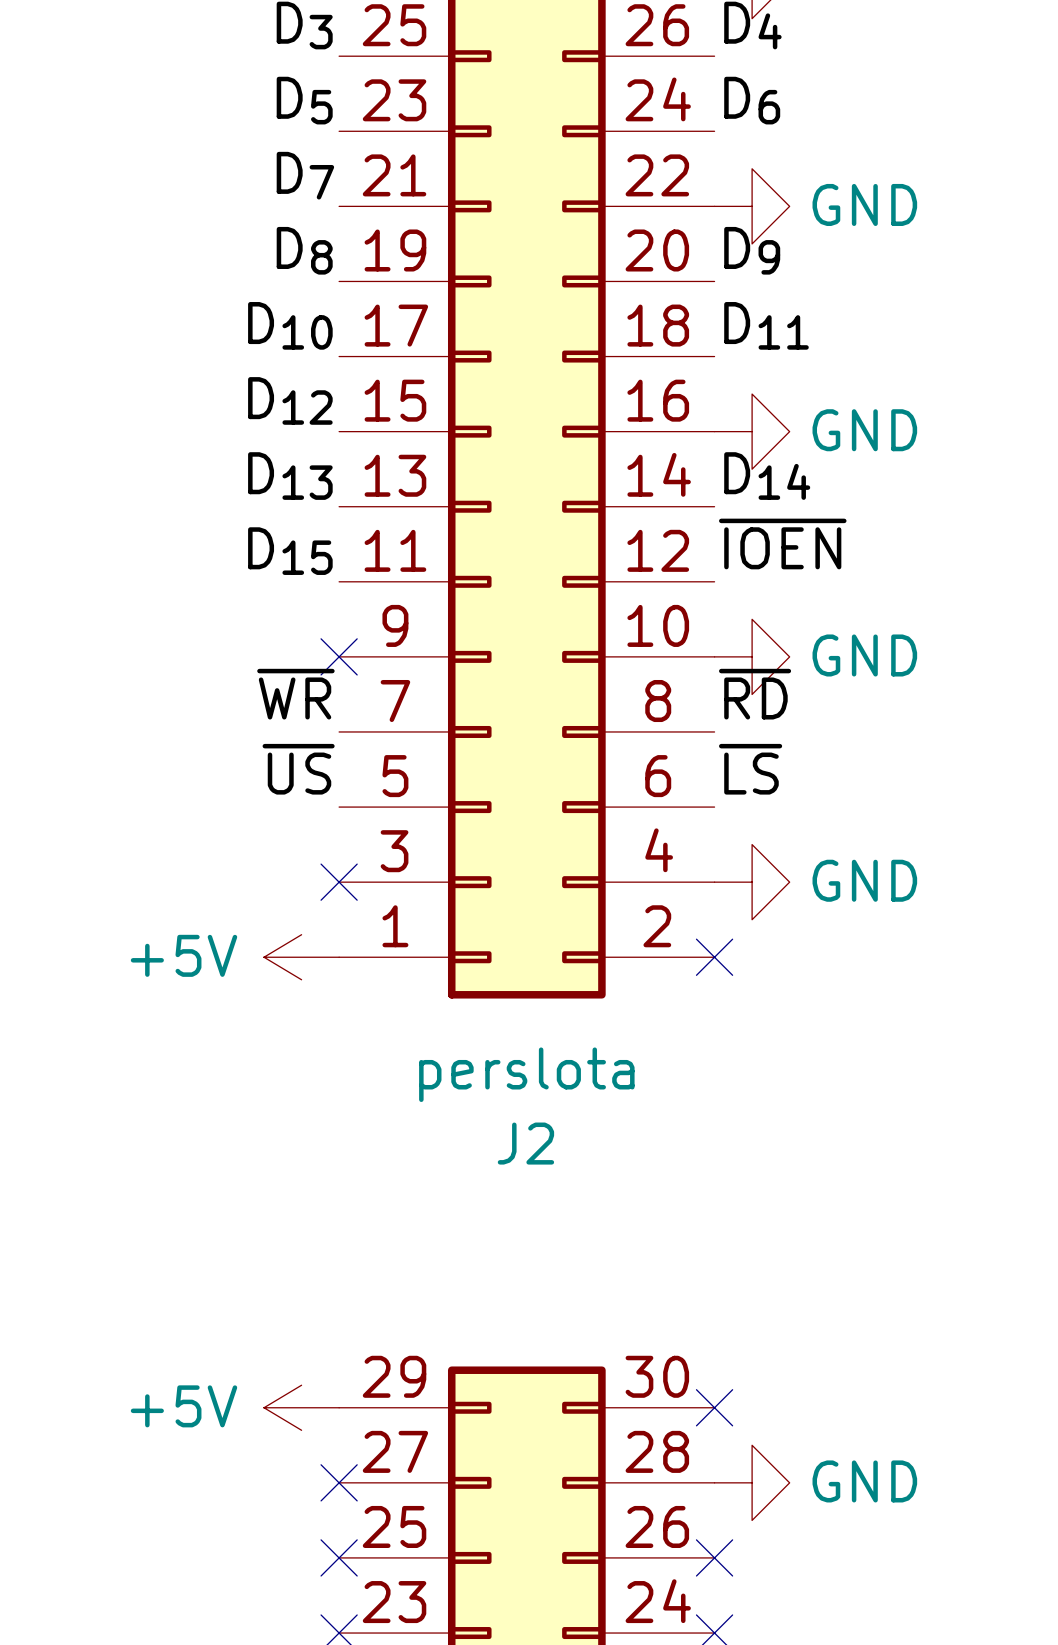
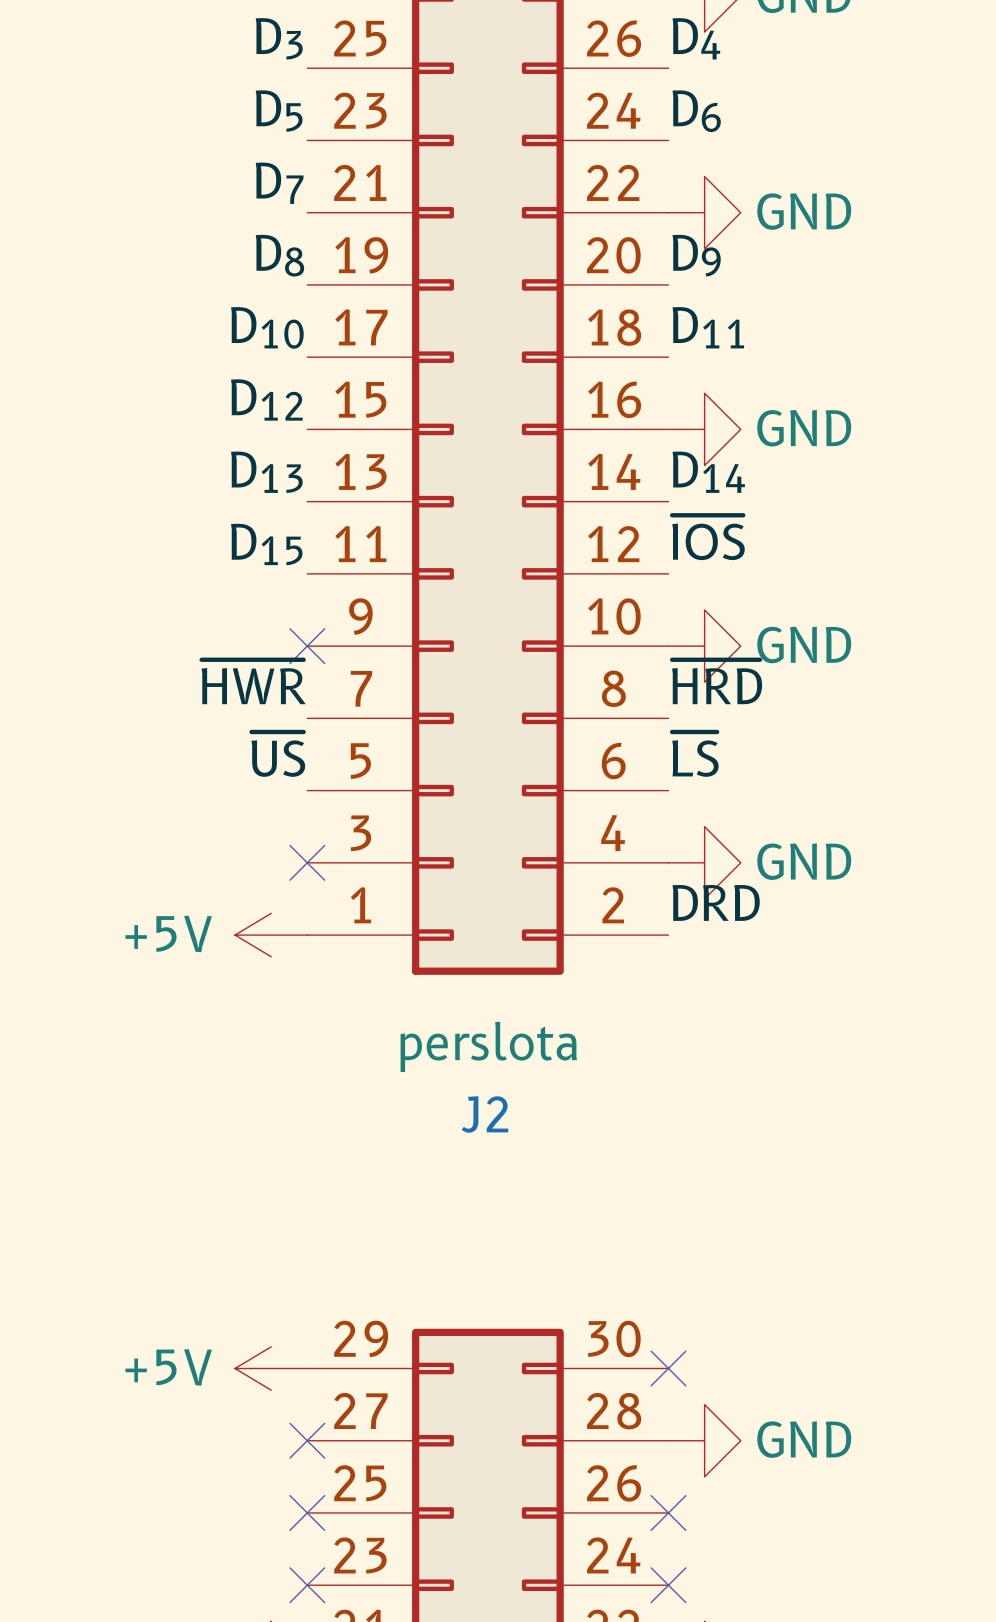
label: ~{IOEN} (782, 543) -> ~{IOS} (708, 537)
label: ~{WR} (295, 694) -> ~{HWR} (253, 681)
label: ~{RD} (755, 694) -> ~{HRD} (717, 681)
label: none -> DRD (716, 902)
no-connect mark: (714, 957) -> none

